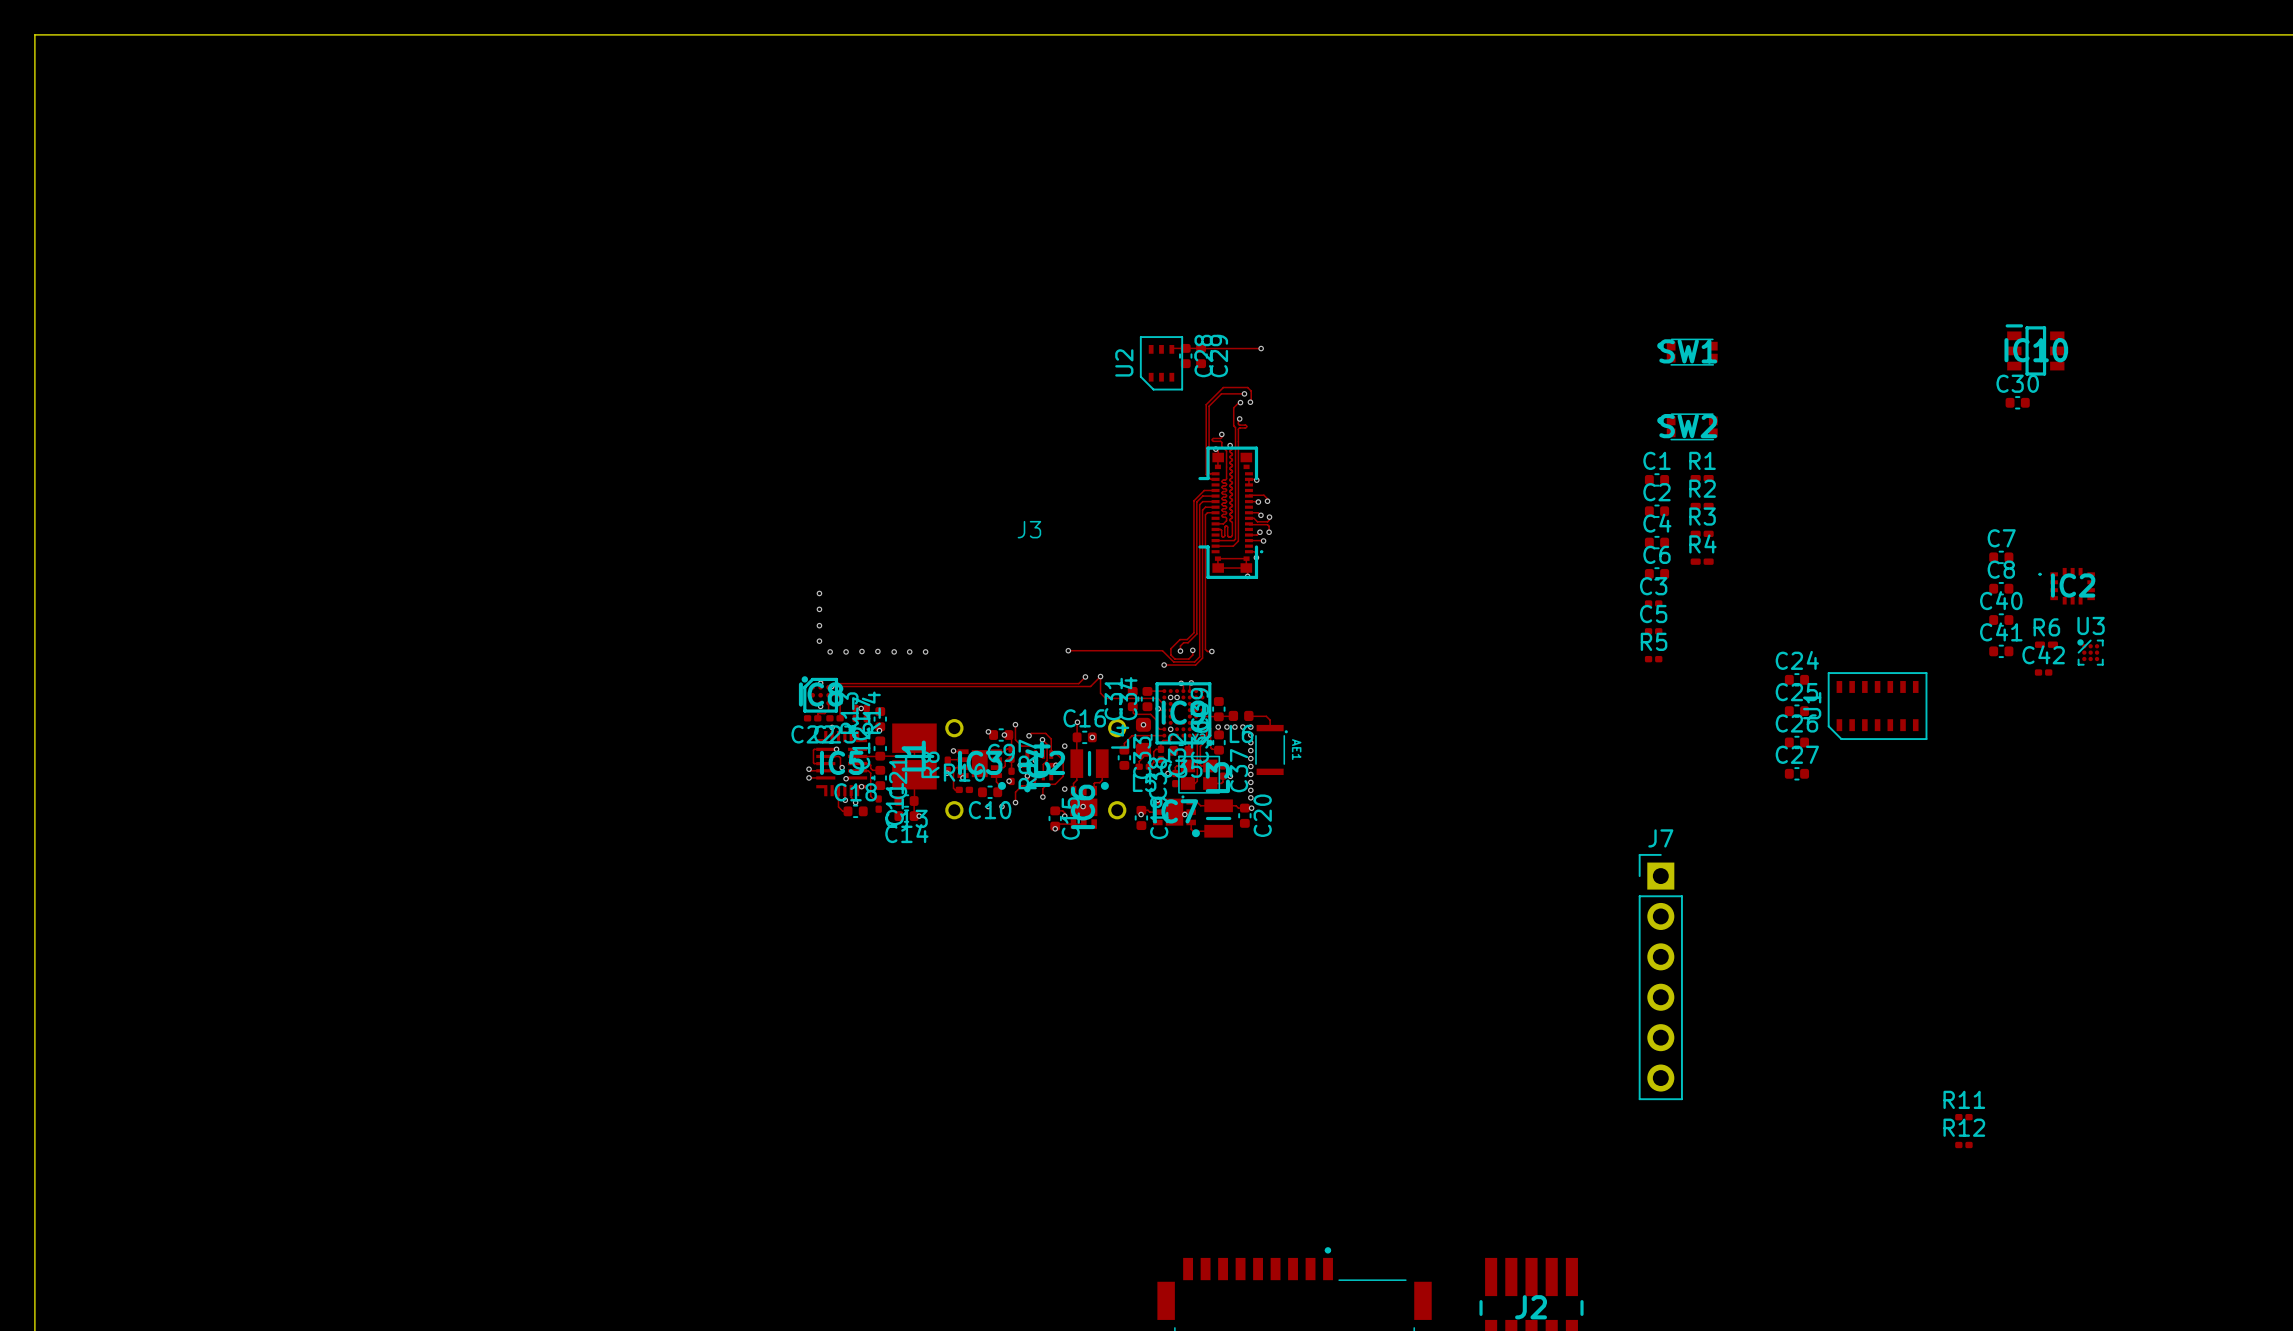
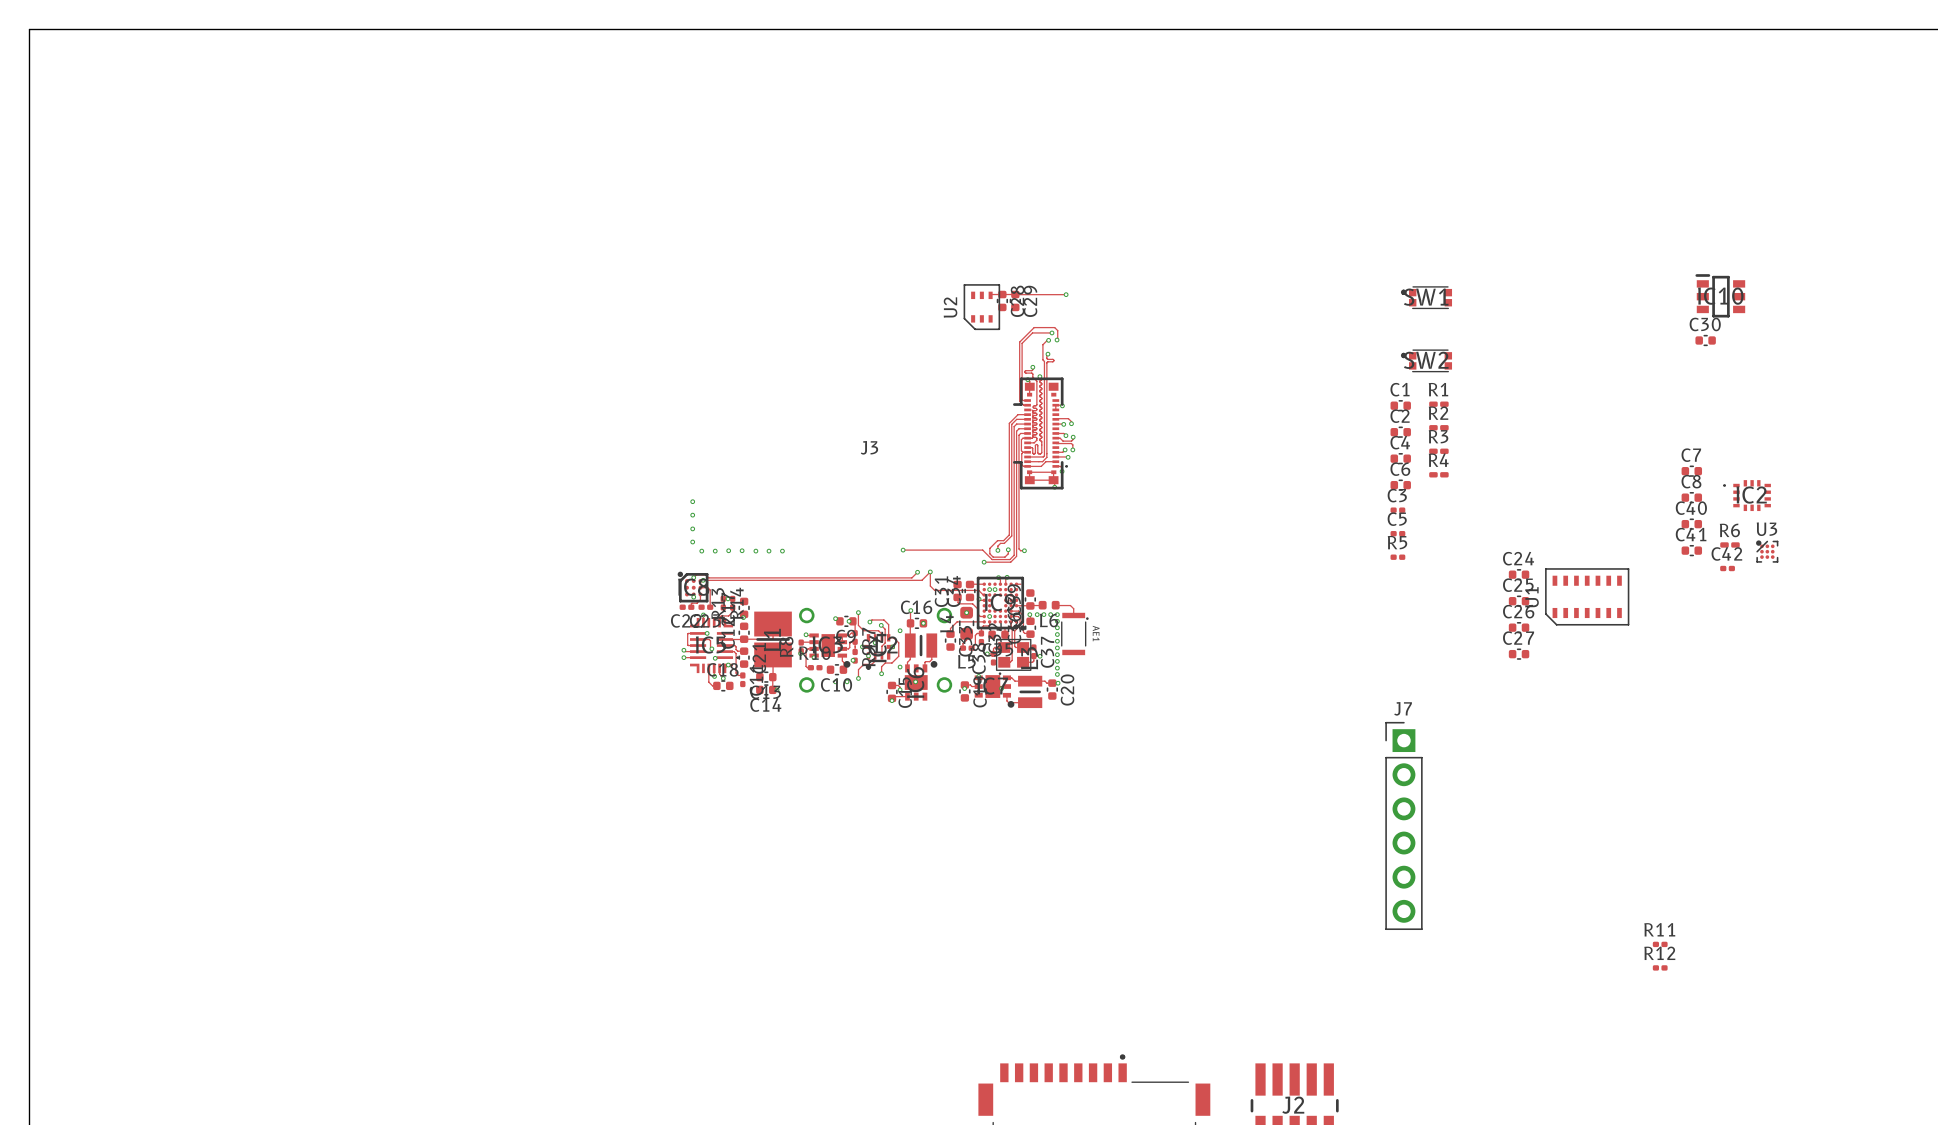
track: none -> (1031, 409) (1032, 437) (1021, 439) (1023, 452)
track: none -> (1023, 452) (1021, 464) (1023, 466) (1041, 466) (1045, 461) (1055, 461)

